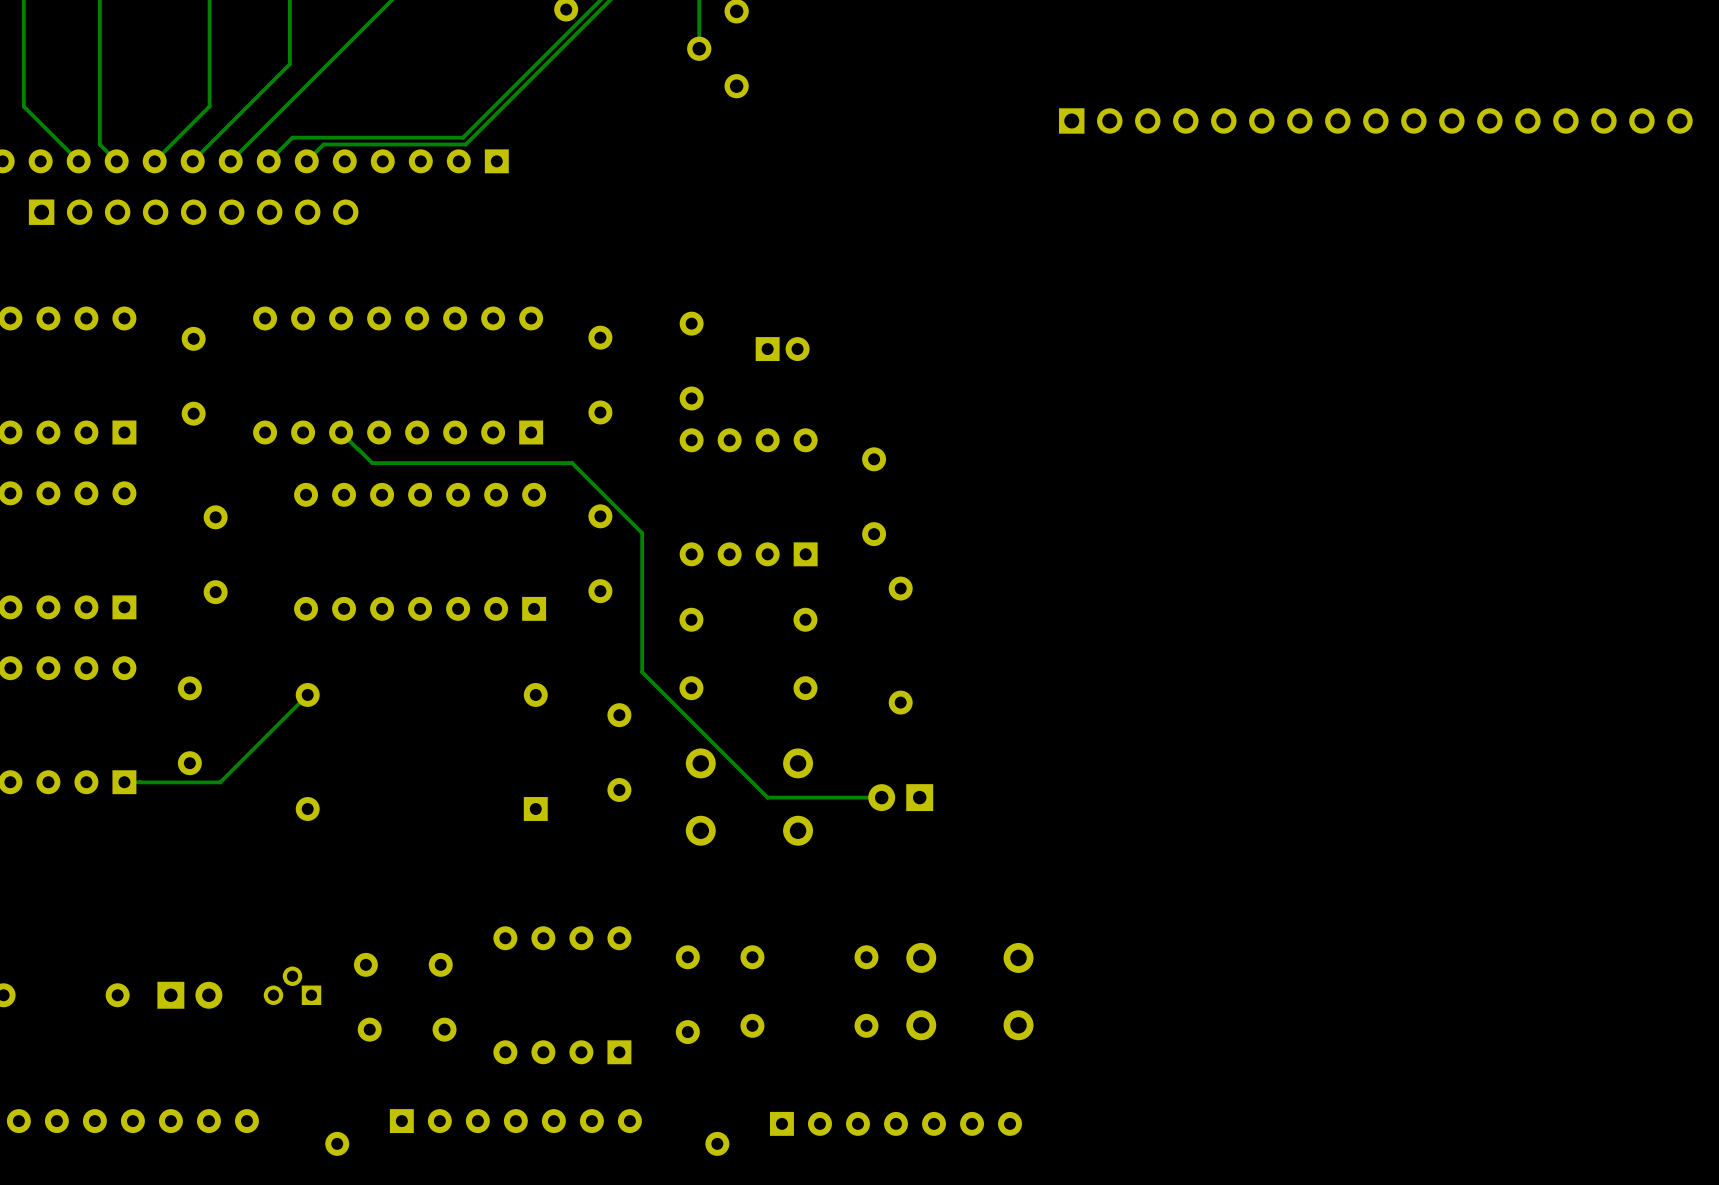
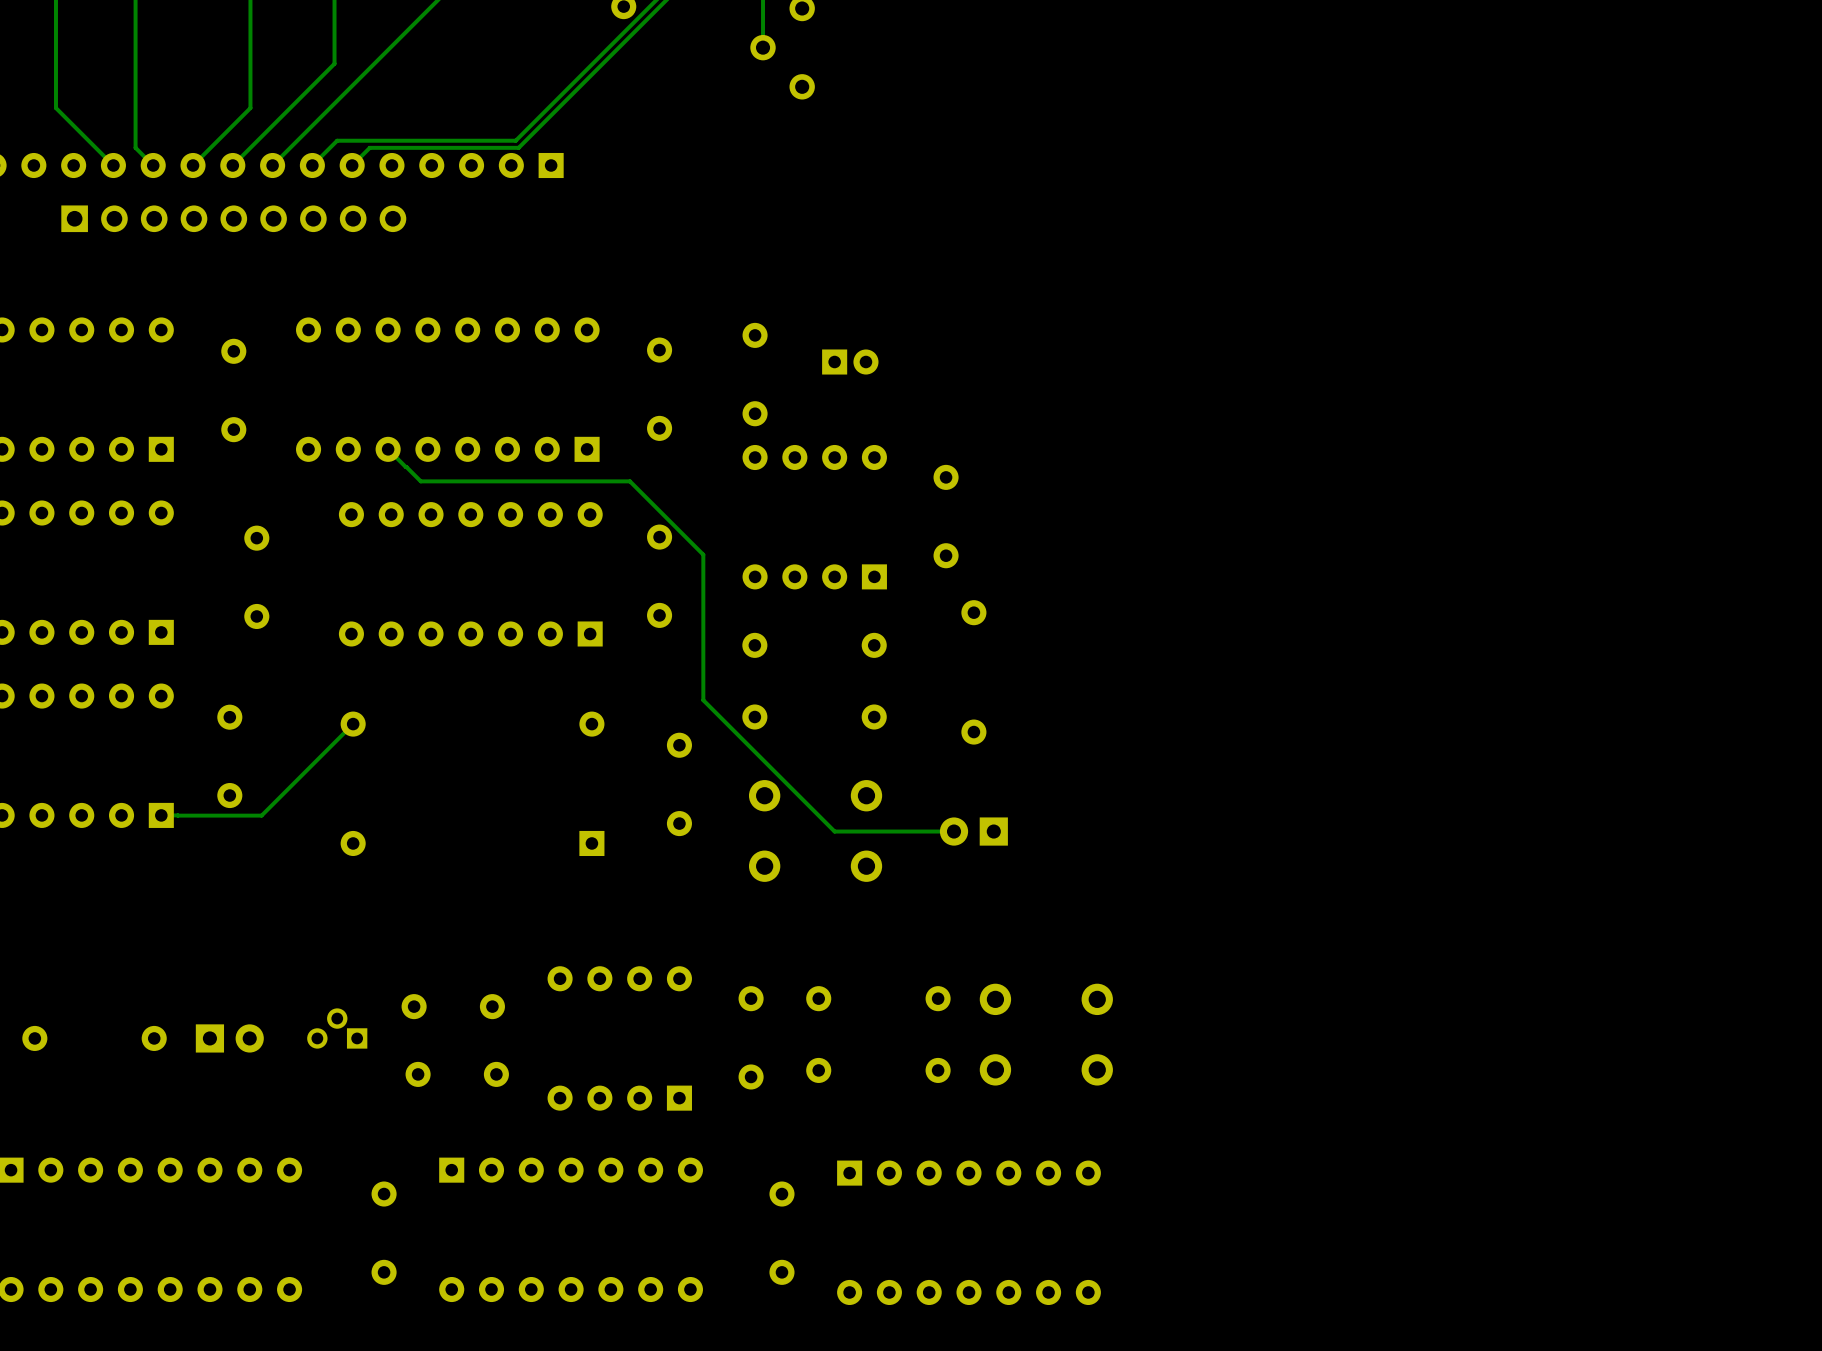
part: (1375, 120) -> none

